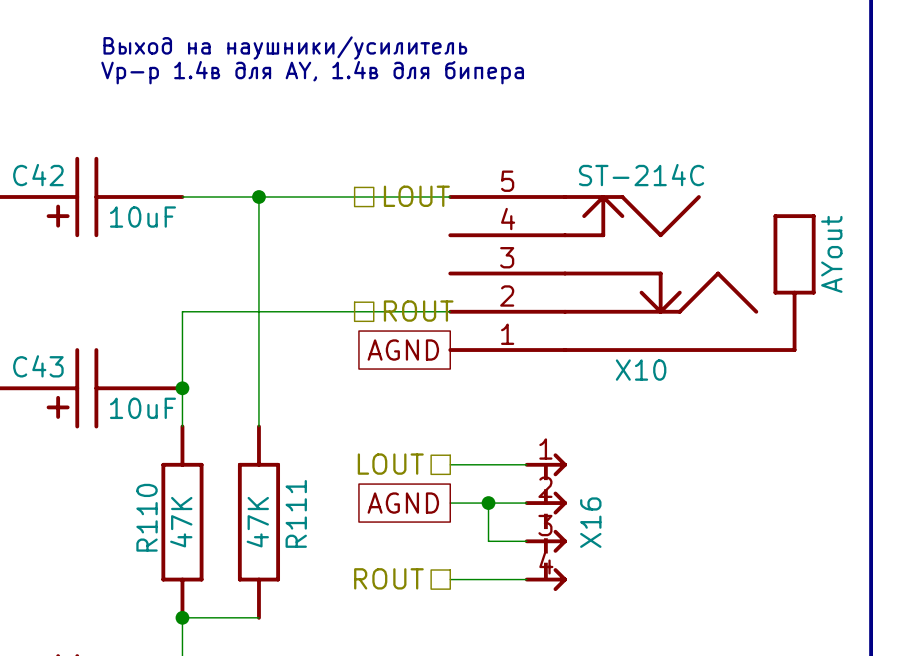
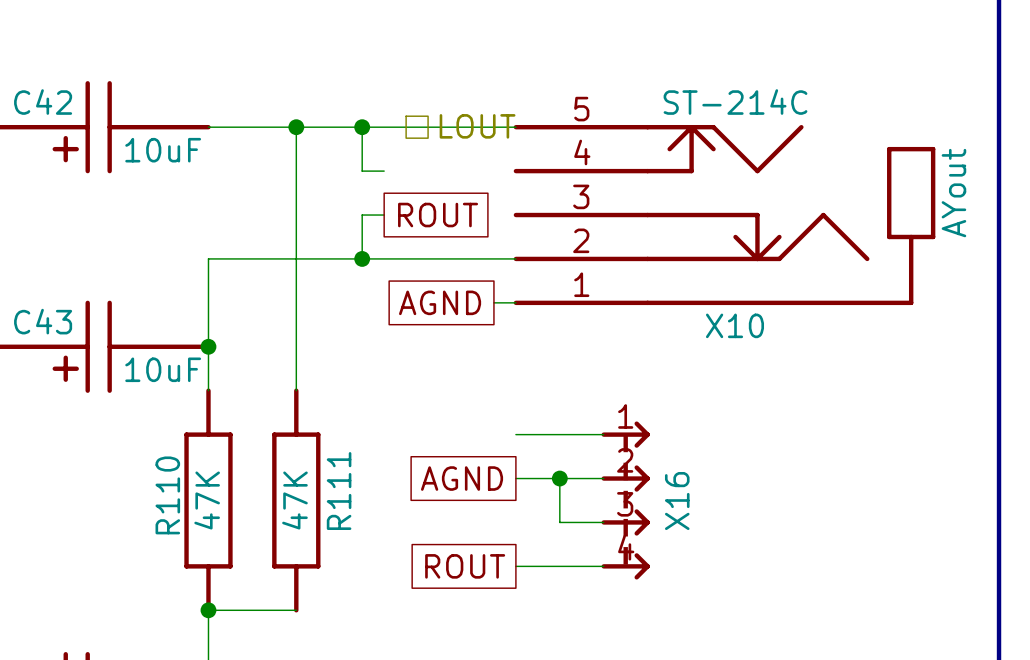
wire: none -> (362, 127) (362, 171) (384, 171)
junction: none -> (362, 127)
wire: none -> (384, 215) (362, 215) (362, 258)
global label: none -> ROUT (438, 215)
junction: none -> (362, 258)
hierarchical label: ROUT (418, 311) -> none
global label position: AGND (403, 350) -> AGND (440, 302)
wire: none -> (493, 302) (515, 302)
hierarchical label: LOUT (390, 464) -> none
hierarchical label: ROUT (388, 578) -> none
global label: none -> ROUT (465, 566)

